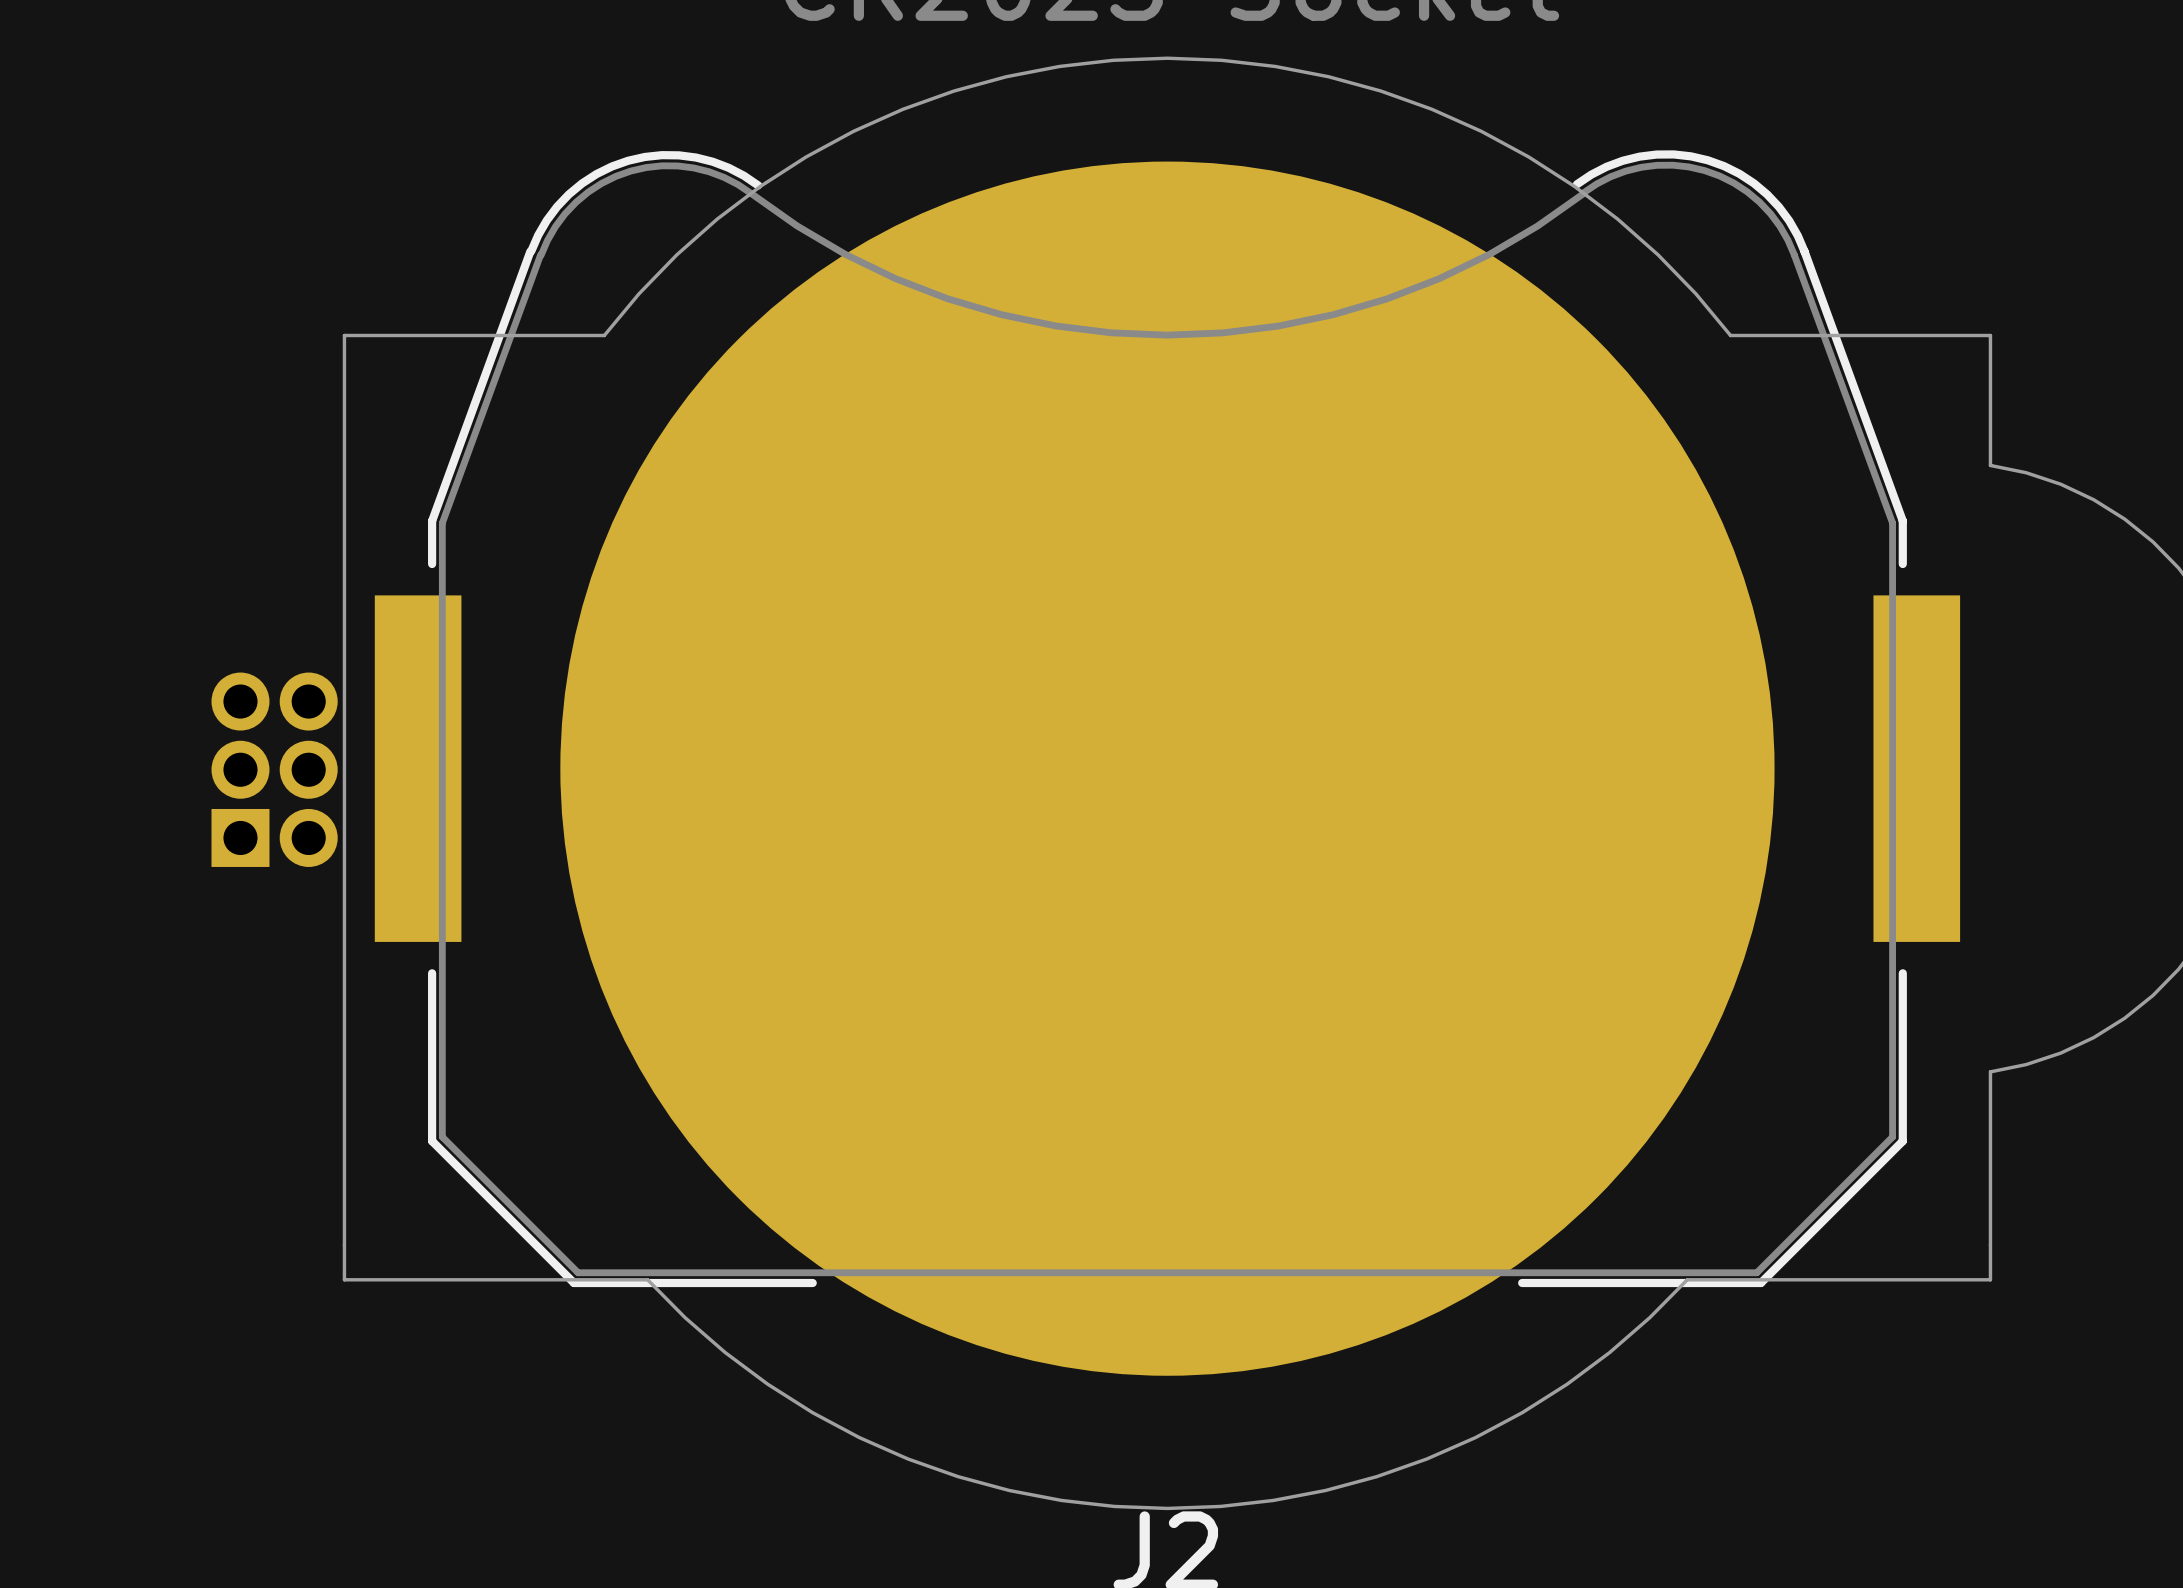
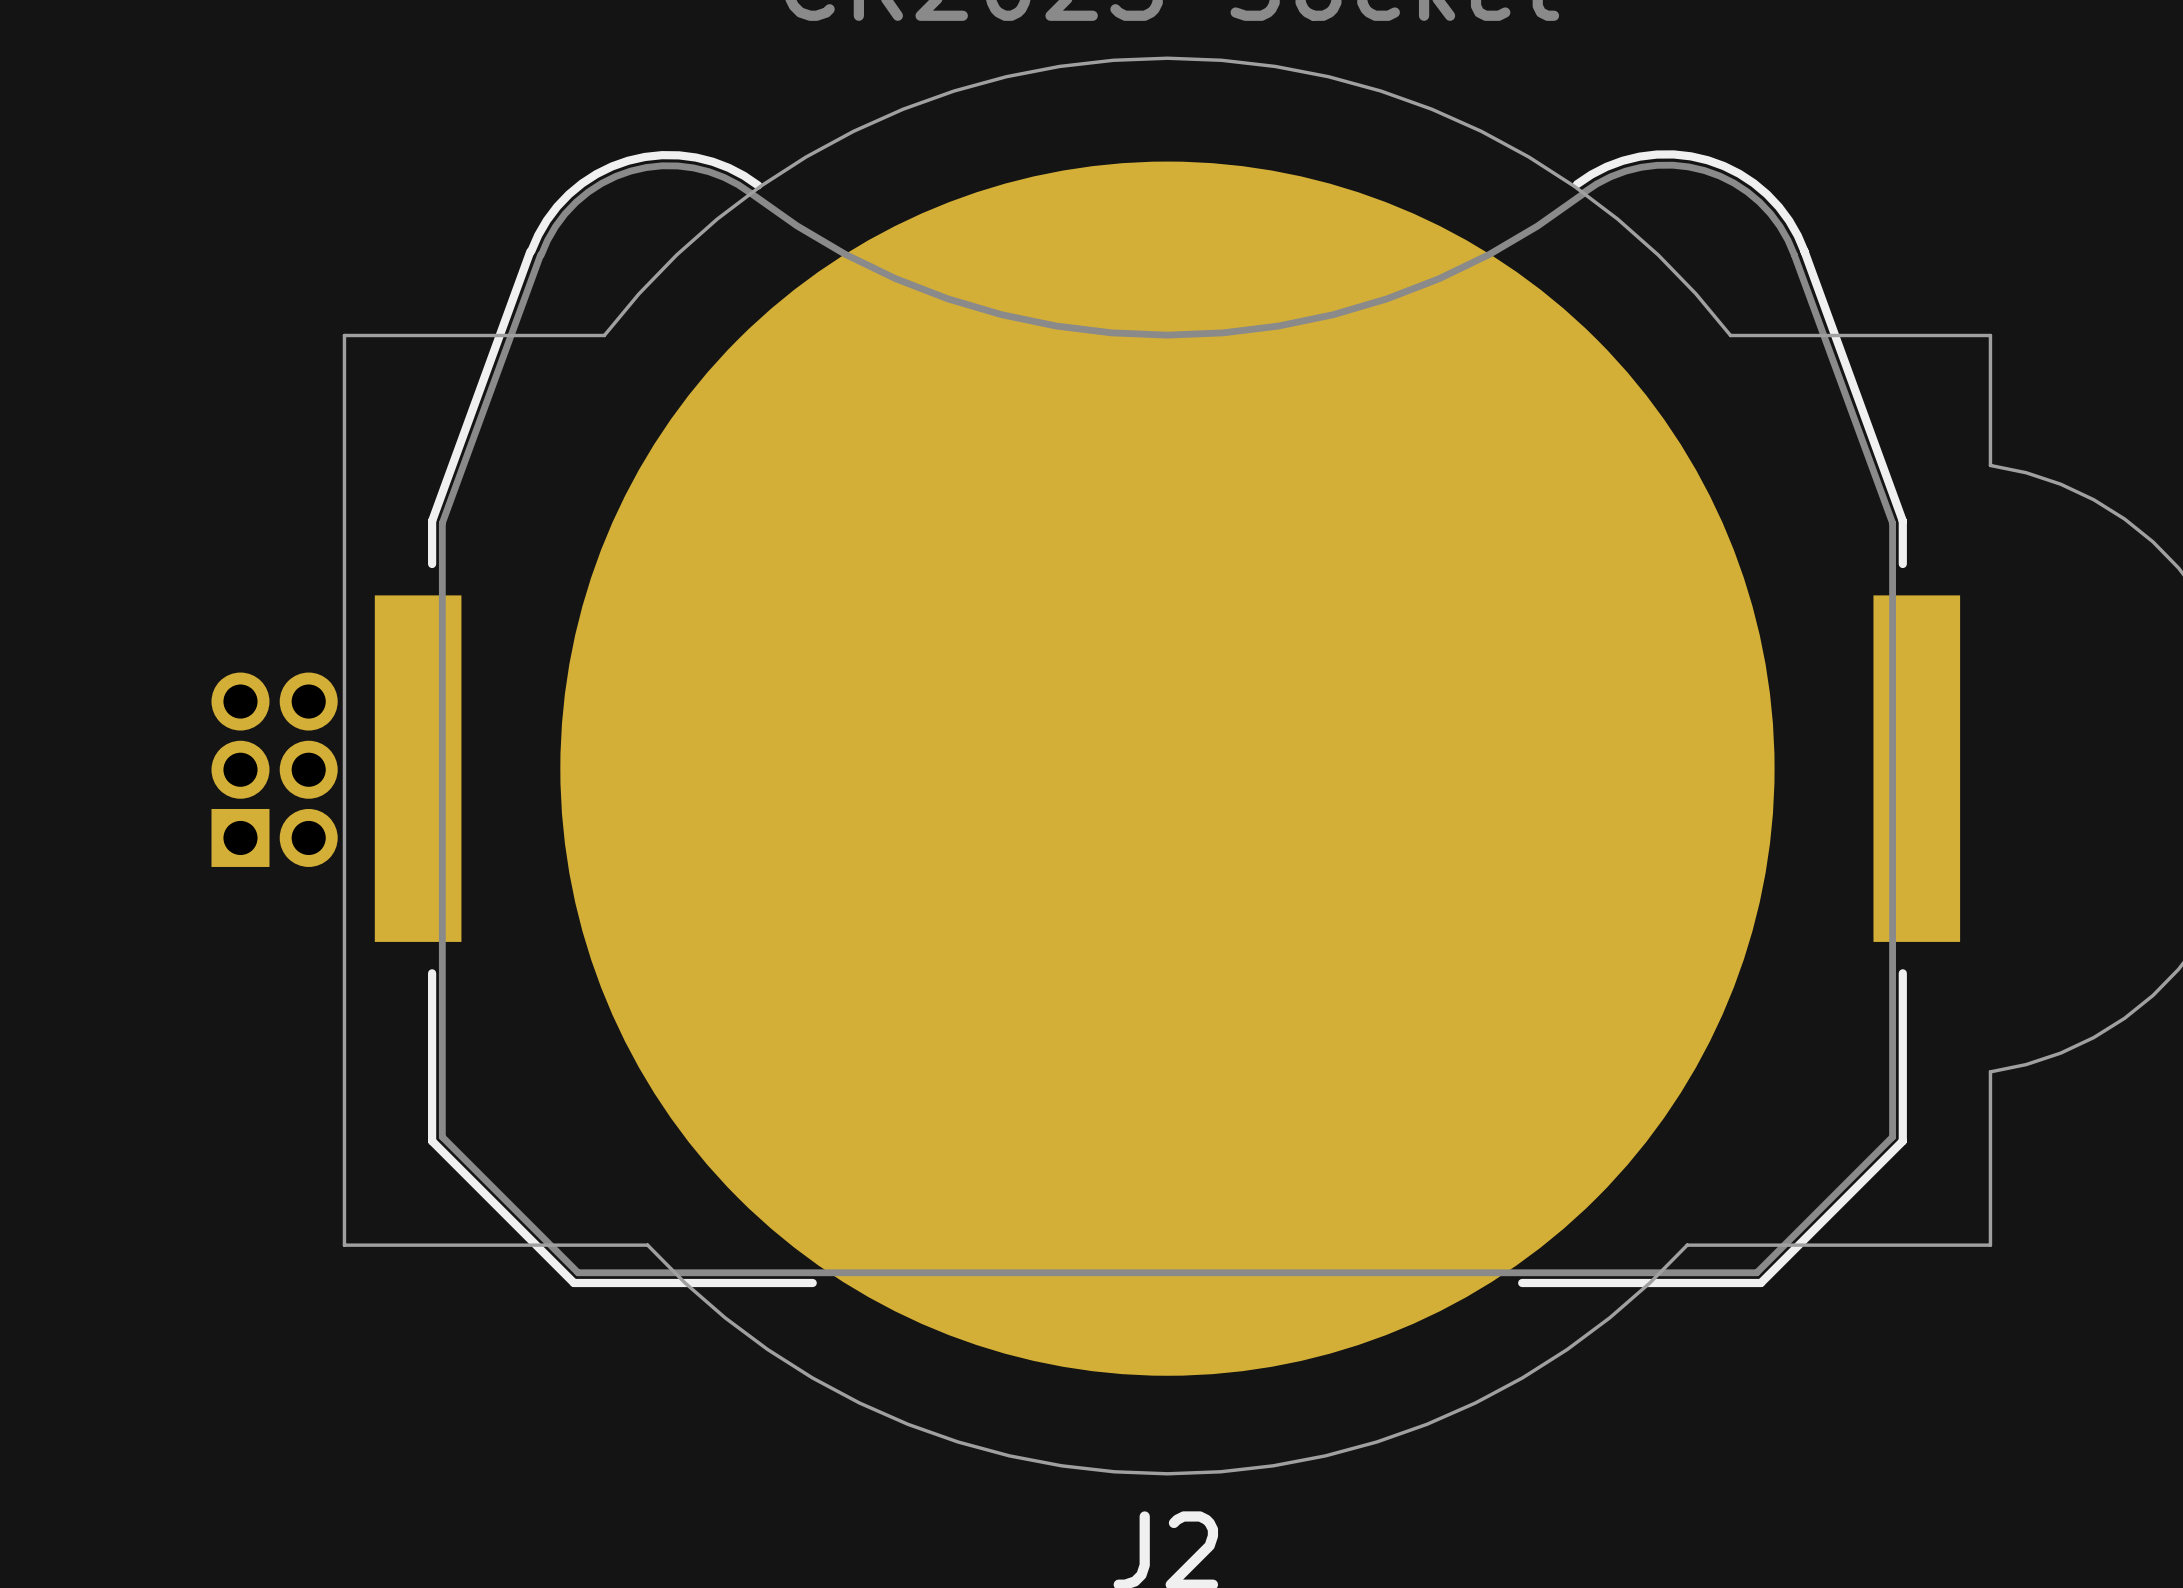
board edge: (1990, 1245) (1990, 1279) (1687, 1279) (1649, 1317) (1609, 1352) (1567, 1384) (1522, 1412) (1475, 1437) (1426, 1458) (1376, 1476) (1325, 1490) (1273, 1500) (1220, 1506) (1167, 1508) (1114, 1506) (1061, 1500) (1009, 1490) (958, 1476) (908, 1458) (859, 1437) (812, 1412) (767, 1384) (725, 1352) (685, 1317) (647, 1279) (344, 1279) (344, 1245) -> (1990, 1245) (1687, 1245) (1649, 1282) (1609, 1317) (1567, 1349) (1522, 1377) (1475, 1402) (1426, 1424) (1376, 1442) (1325, 1455) (1273, 1465) (1220, 1471) (1167, 1473) (1114, 1471) (1061, 1465) (1009, 1455) (958, 1442) (908, 1424) (859, 1402) (812, 1377) (767, 1349) (725, 1317) (685, 1282) (647, 1245) (344, 1245)

